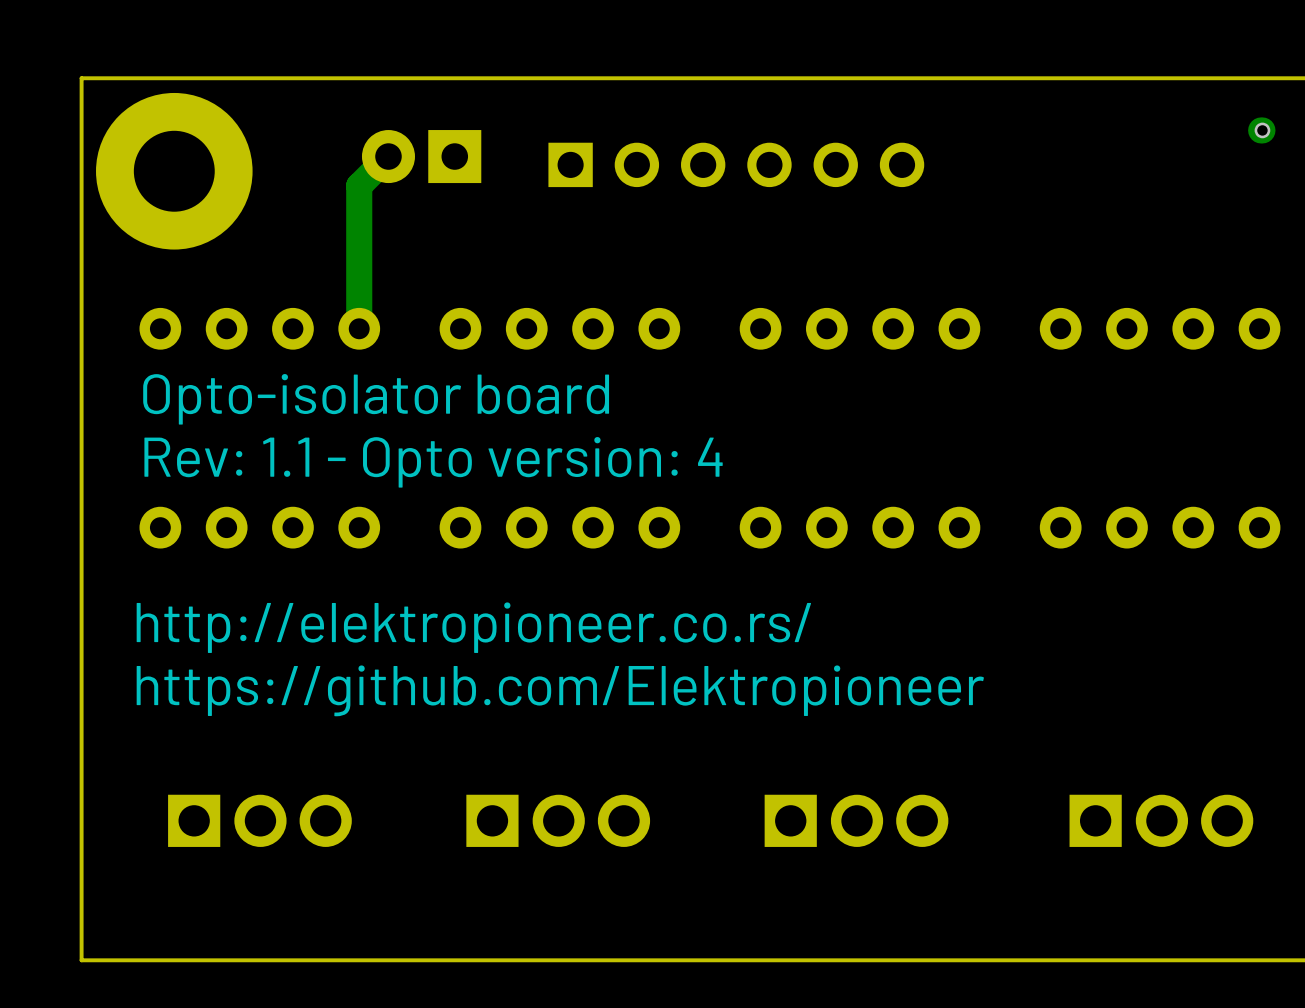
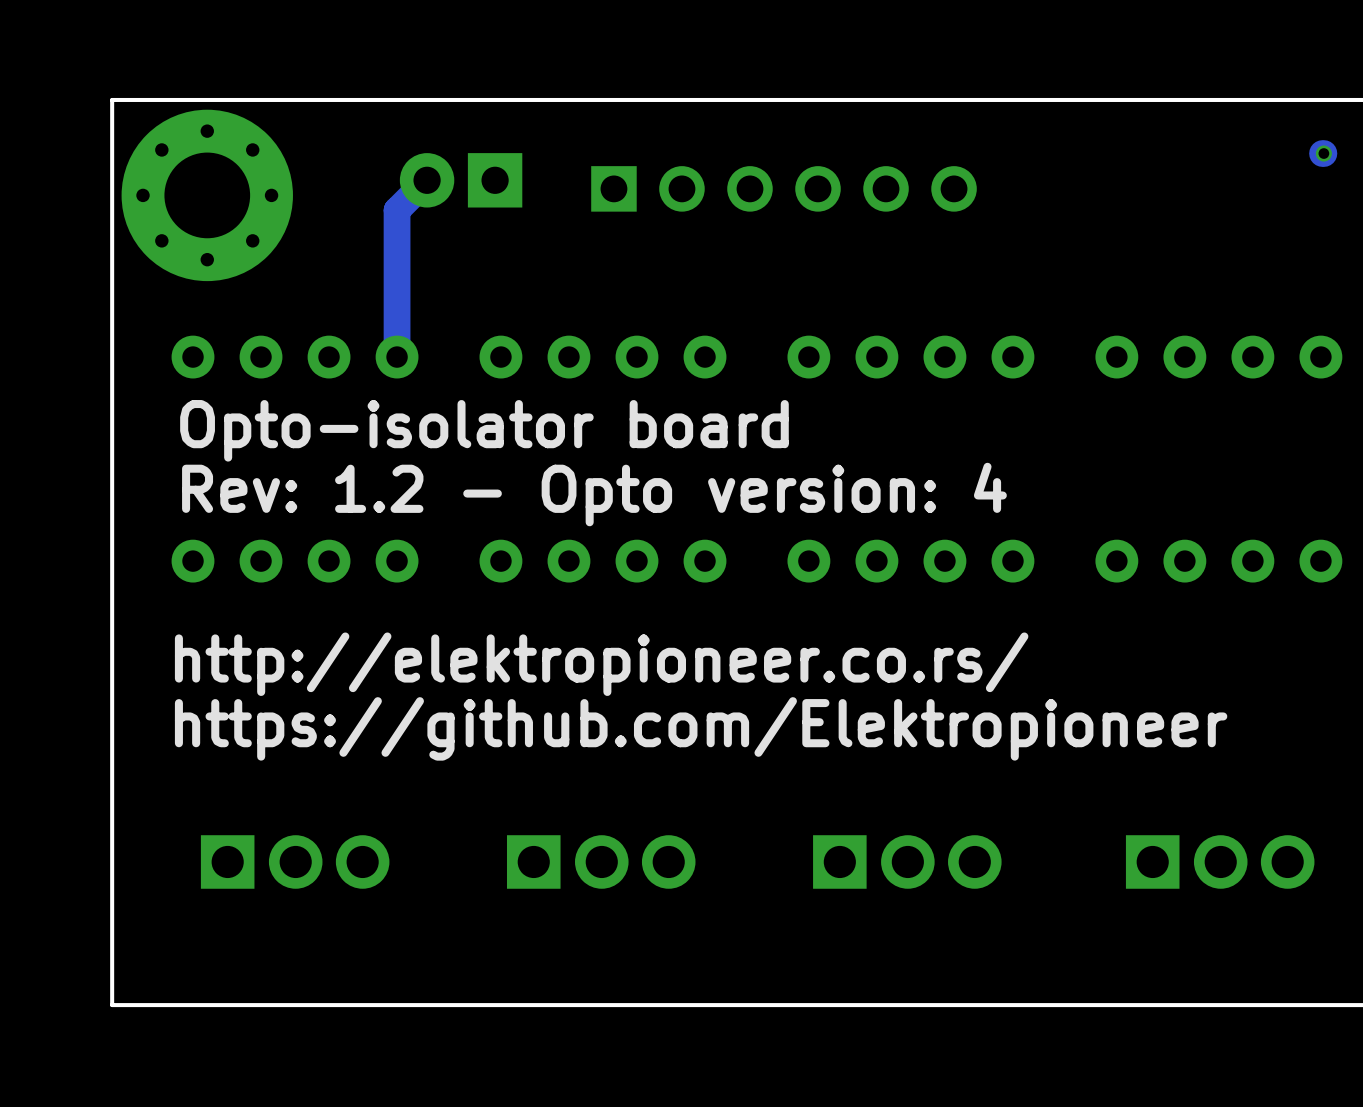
part footprint: [96, 92, 253, 250] -> [121, 109, 293, 282]
text: Rev: 1.1 - Opto version: 4 (433, 462) -> Rev: 1.2 - Opto version: 4 (594, 494)

